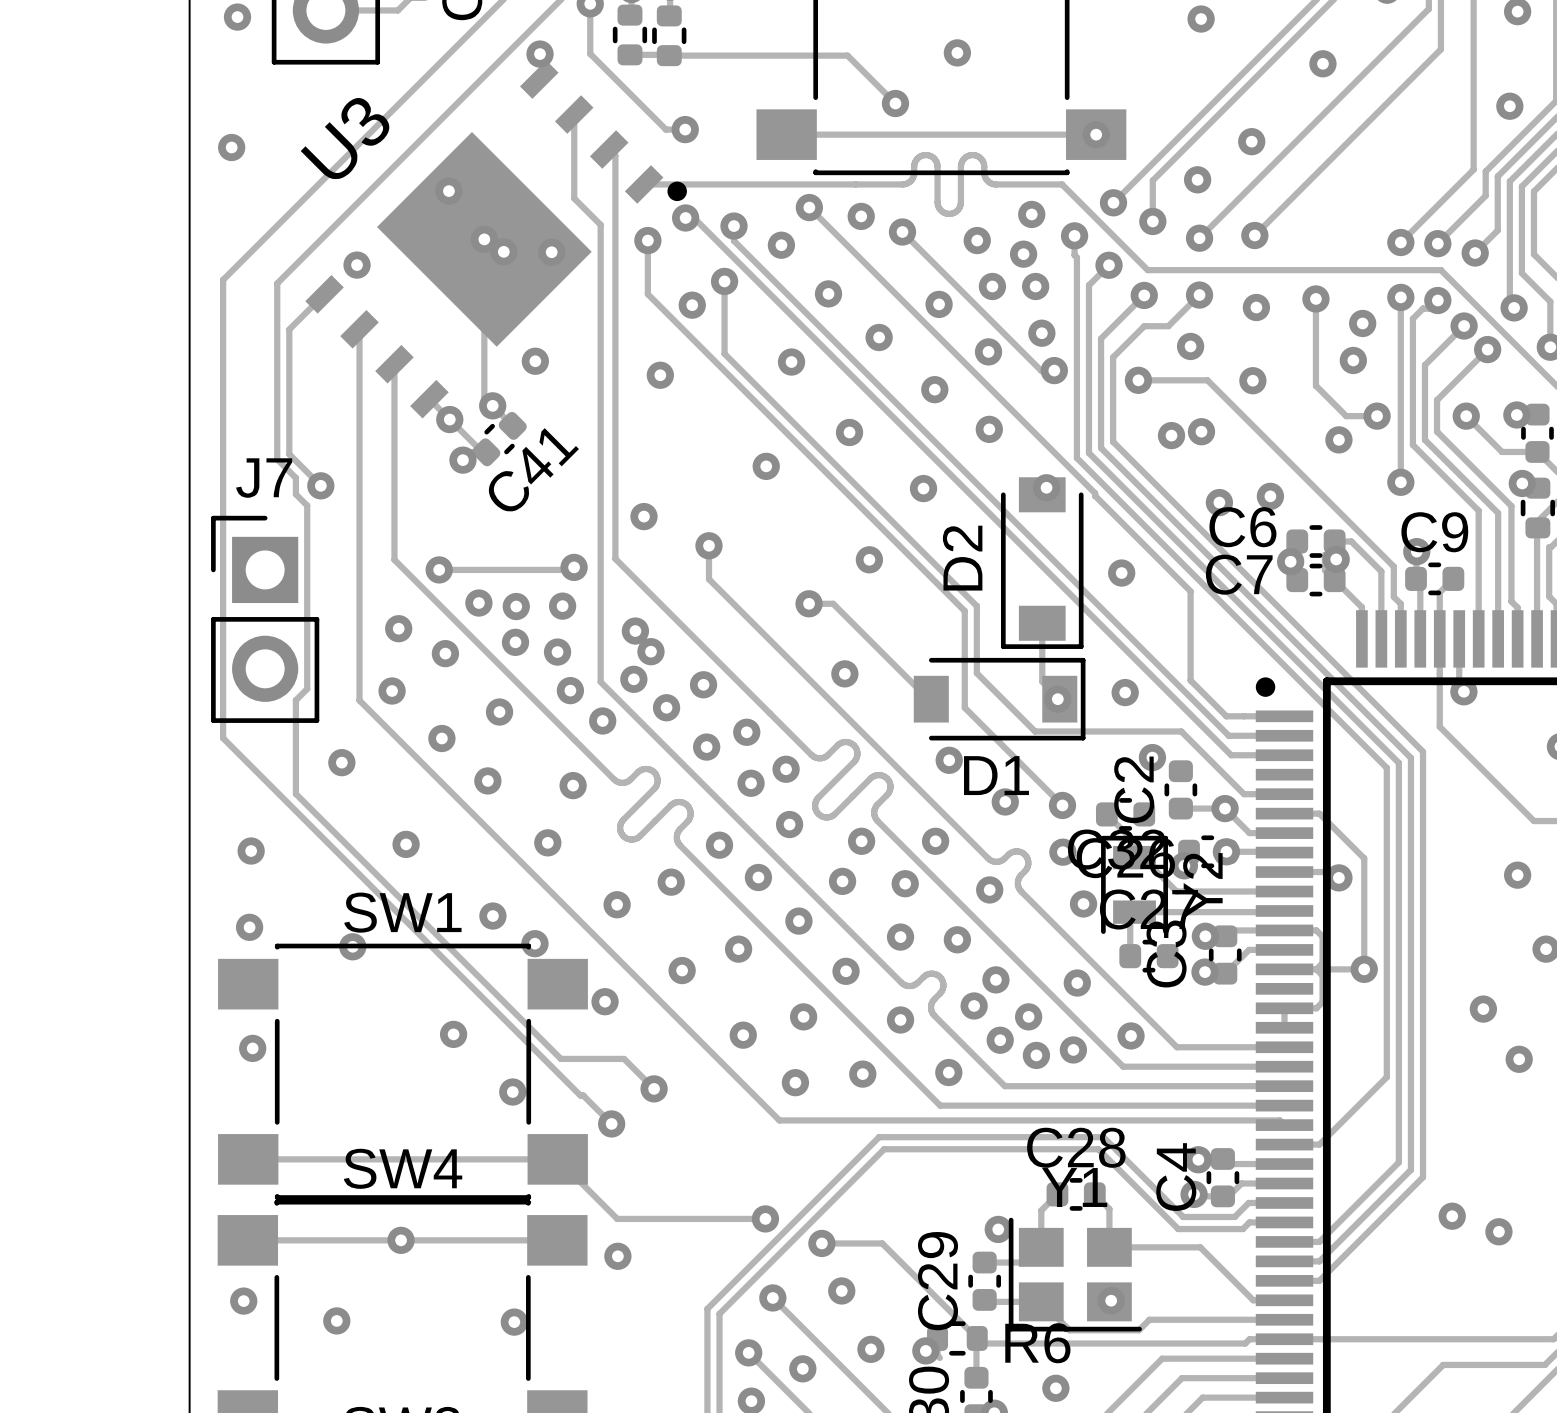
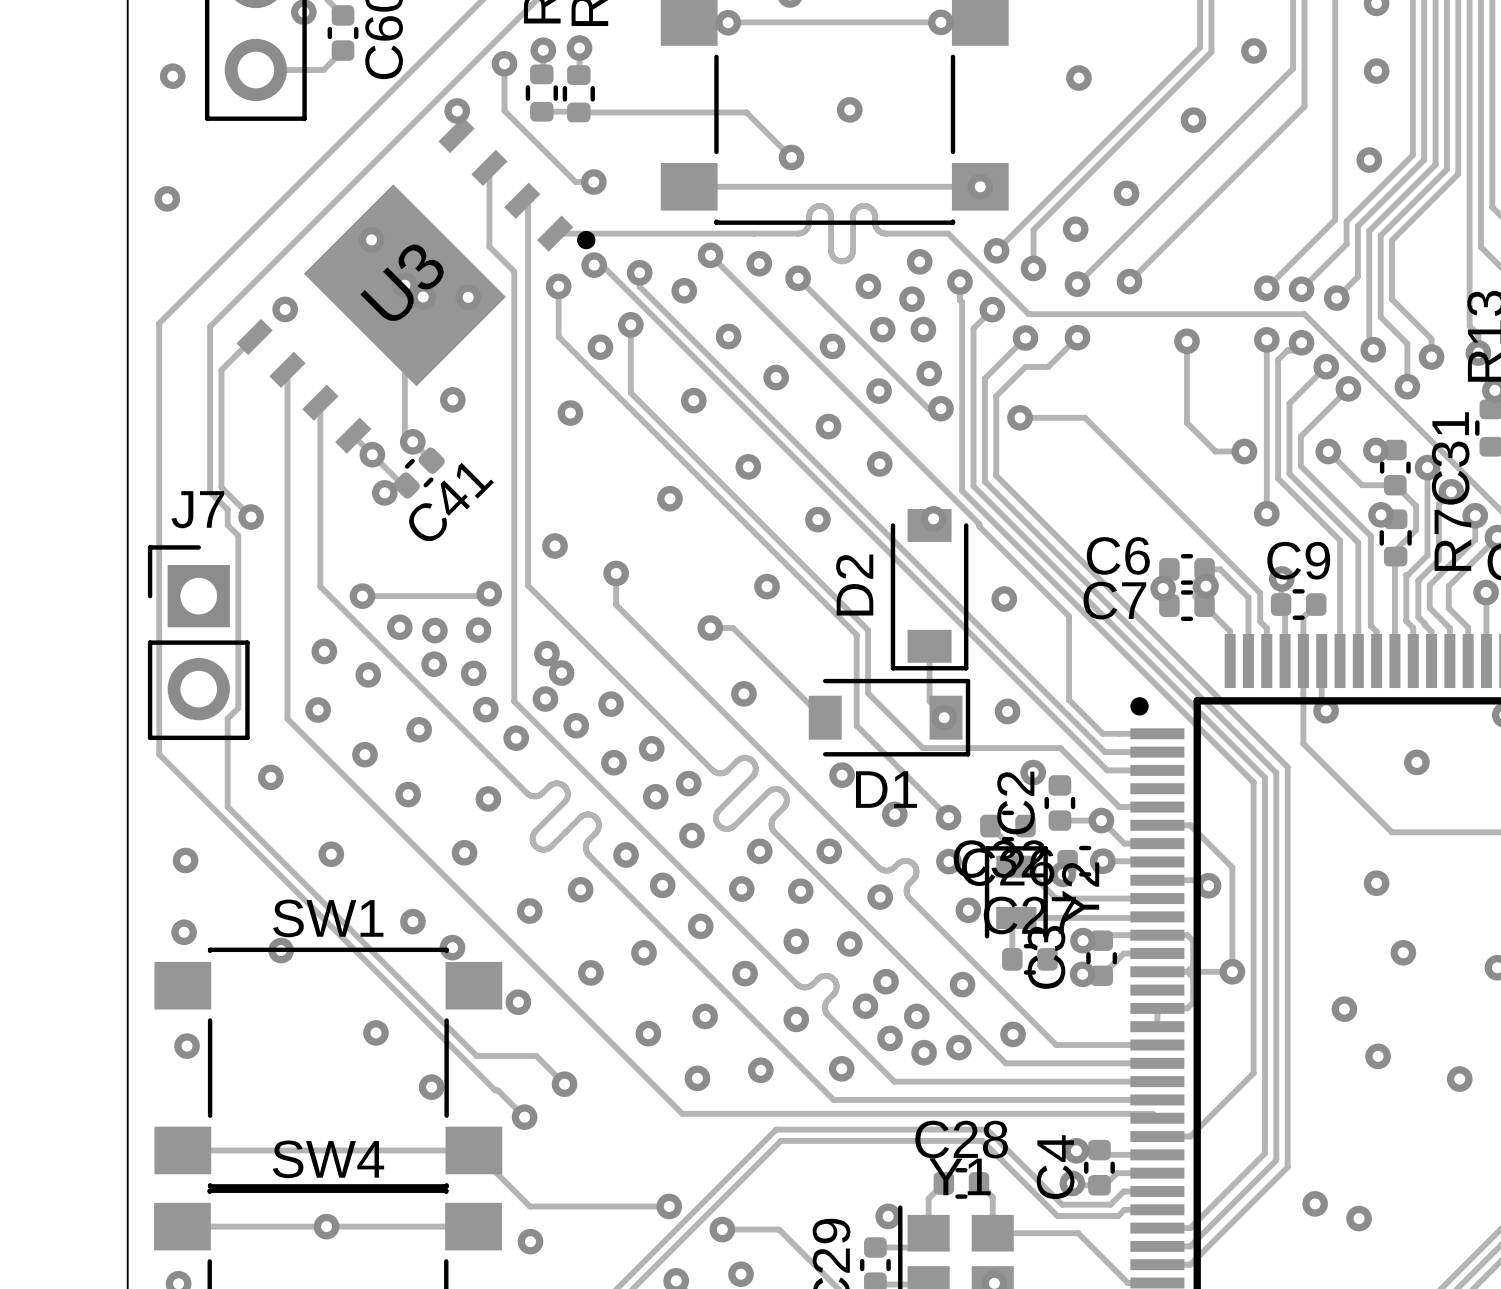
U3 name position: U3 (345, 138) -> U3 (402, 282)
via: (1256, 307) -> none
via: (1362, 323) -> none
via: (1190, 346) -> none
via: (1353, 360) -> none
via: (1252, 380) -> none
via: (1201, 431) -> none
via: (1171, 435) -> none
via: (1338, 439) -> none
via: (1270, 496) -> none
via: (1219, 502) -> none

